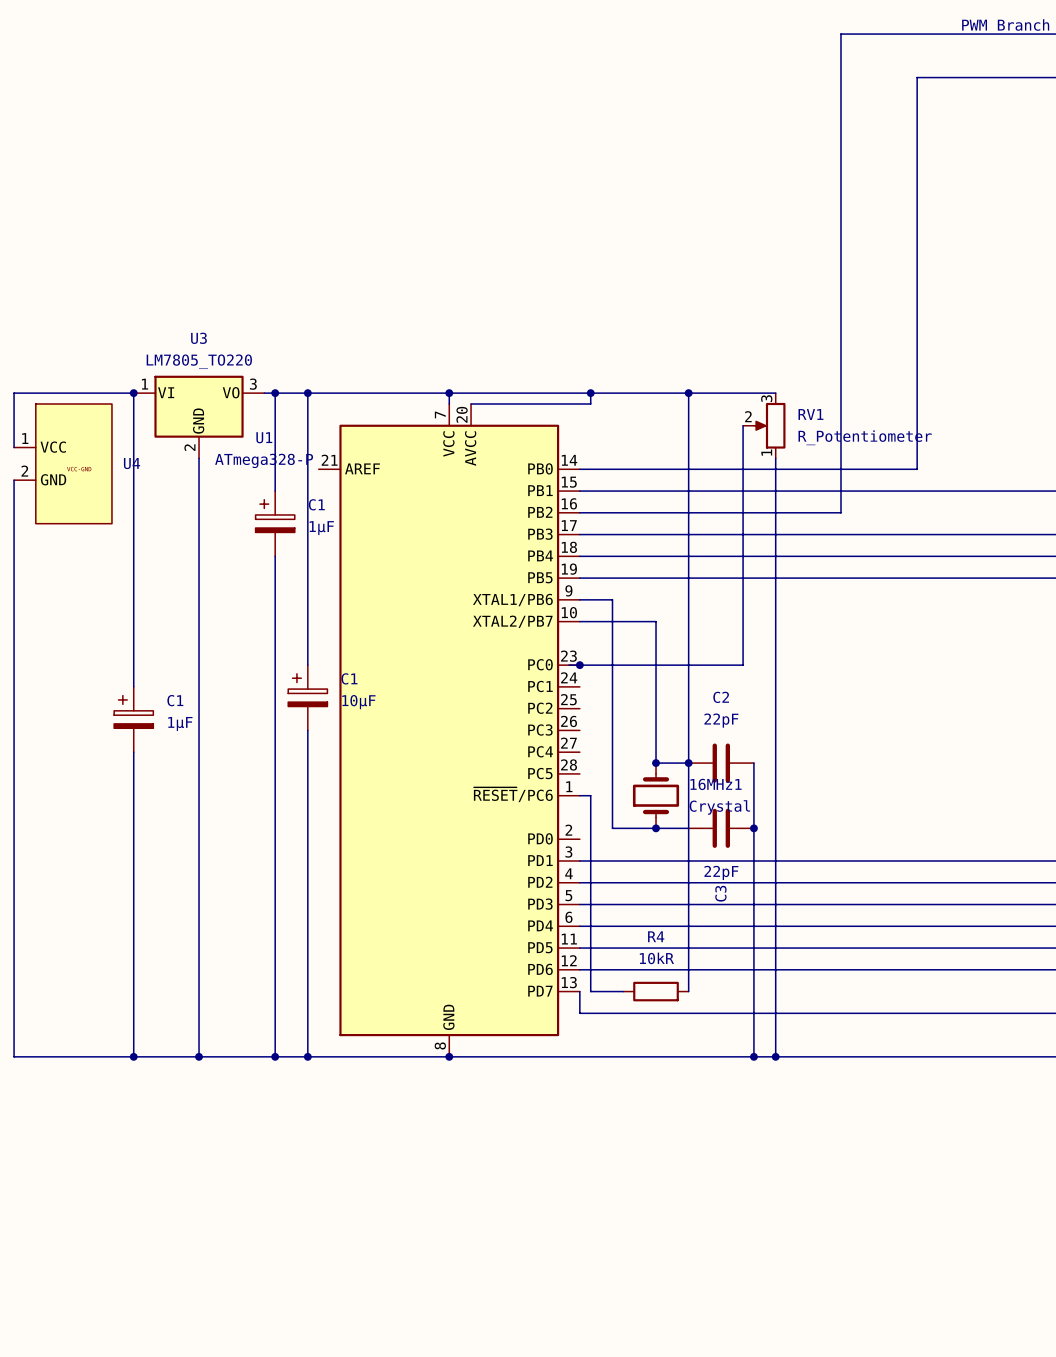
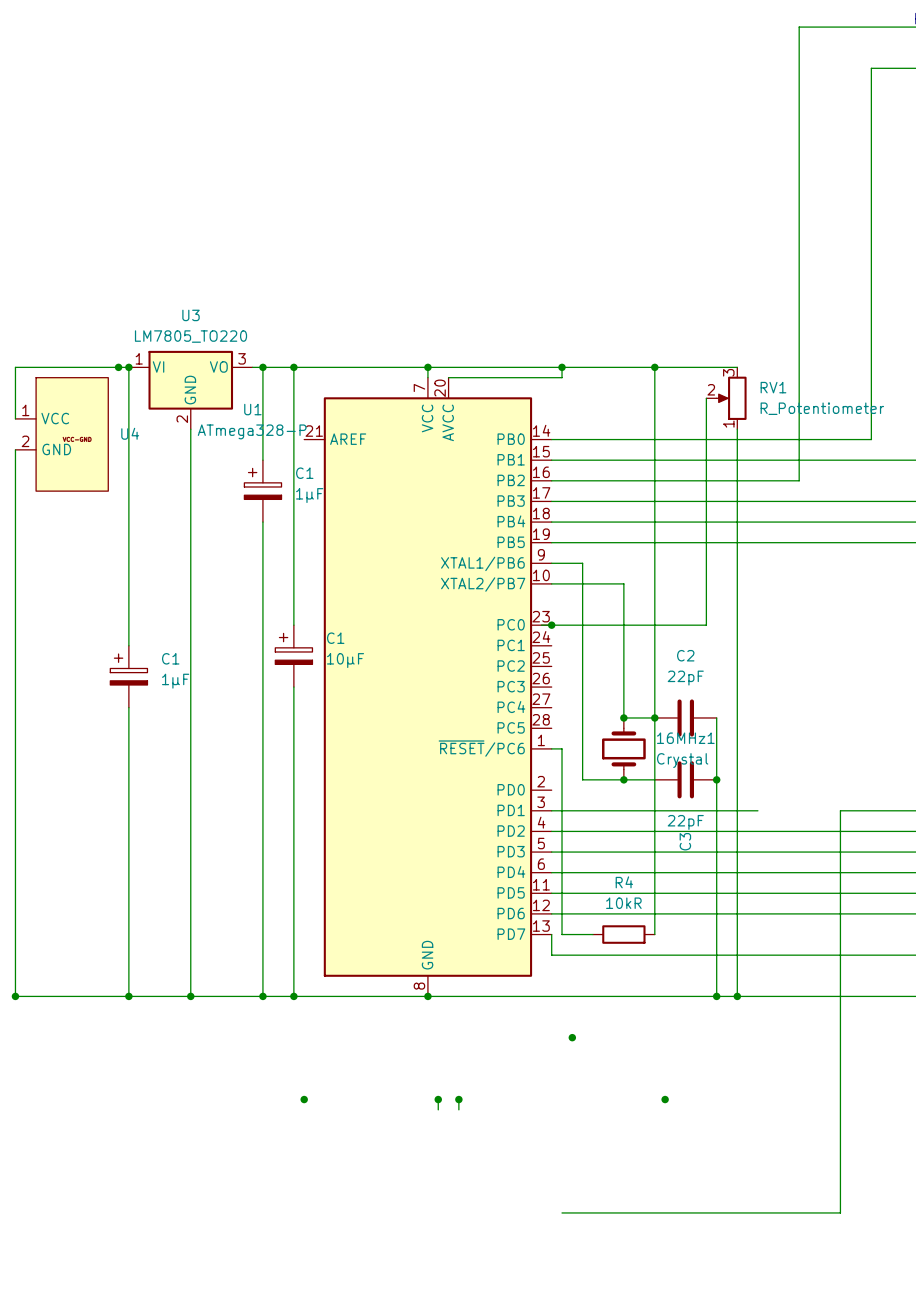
junction: none -> (118, 367)
wire: (797, 860) (884, 860) -> (562, 1212) (840, 1212) (840, 810)
junction: none -> (15, 996)
junction: none -> (572, 1037)
junction: none -> (304, 1099)
wire: none -> (438, 1099) (438, 1109)
junction: none -> (438, 1099)
wire: none -> (458, 1099) (458, 1109)
junction: none -> (458, 1099)
junction: none -> (665, 1099)

